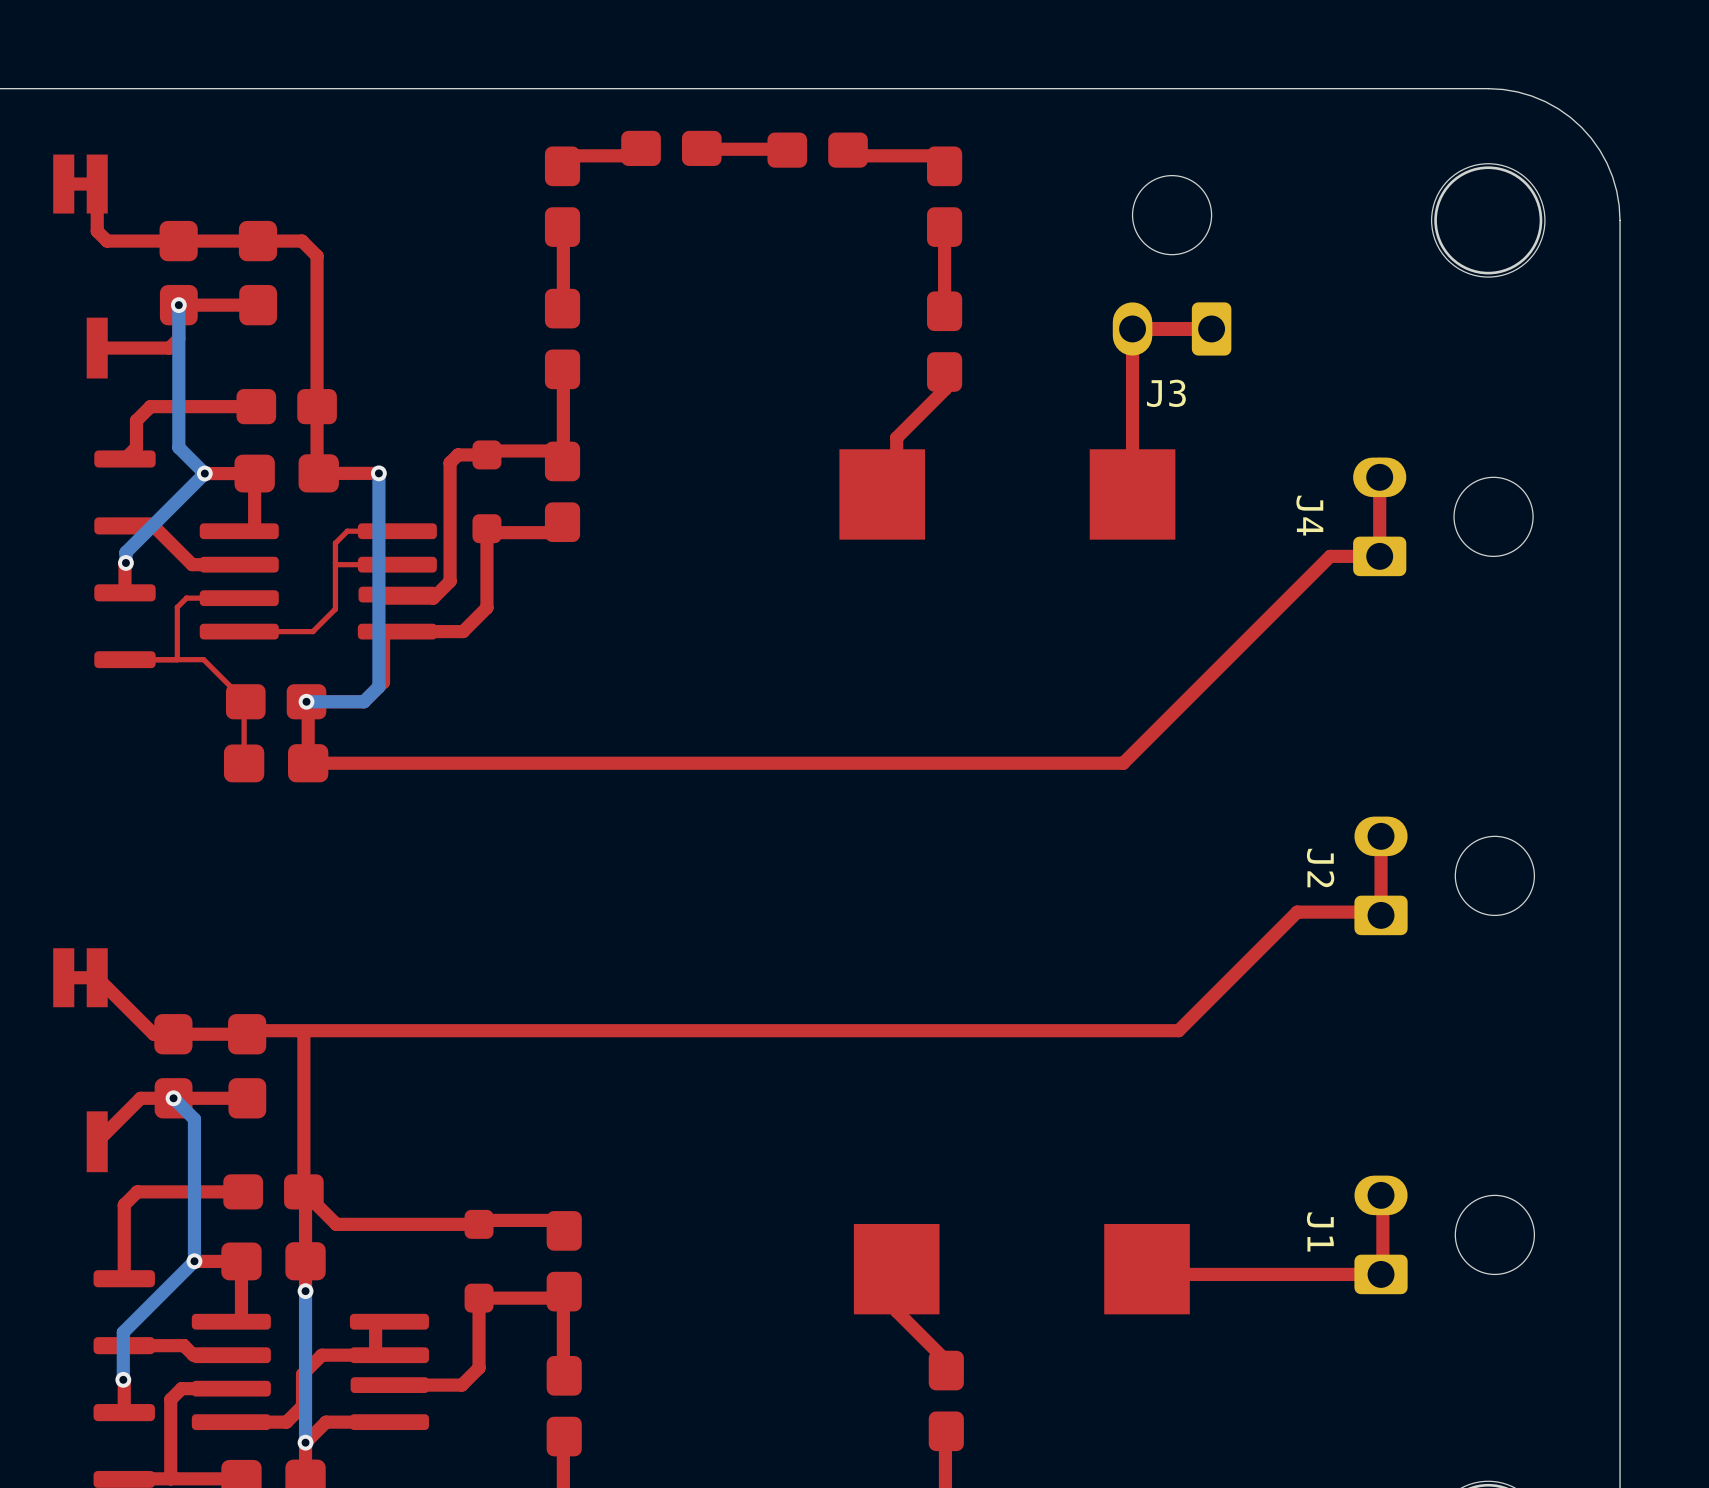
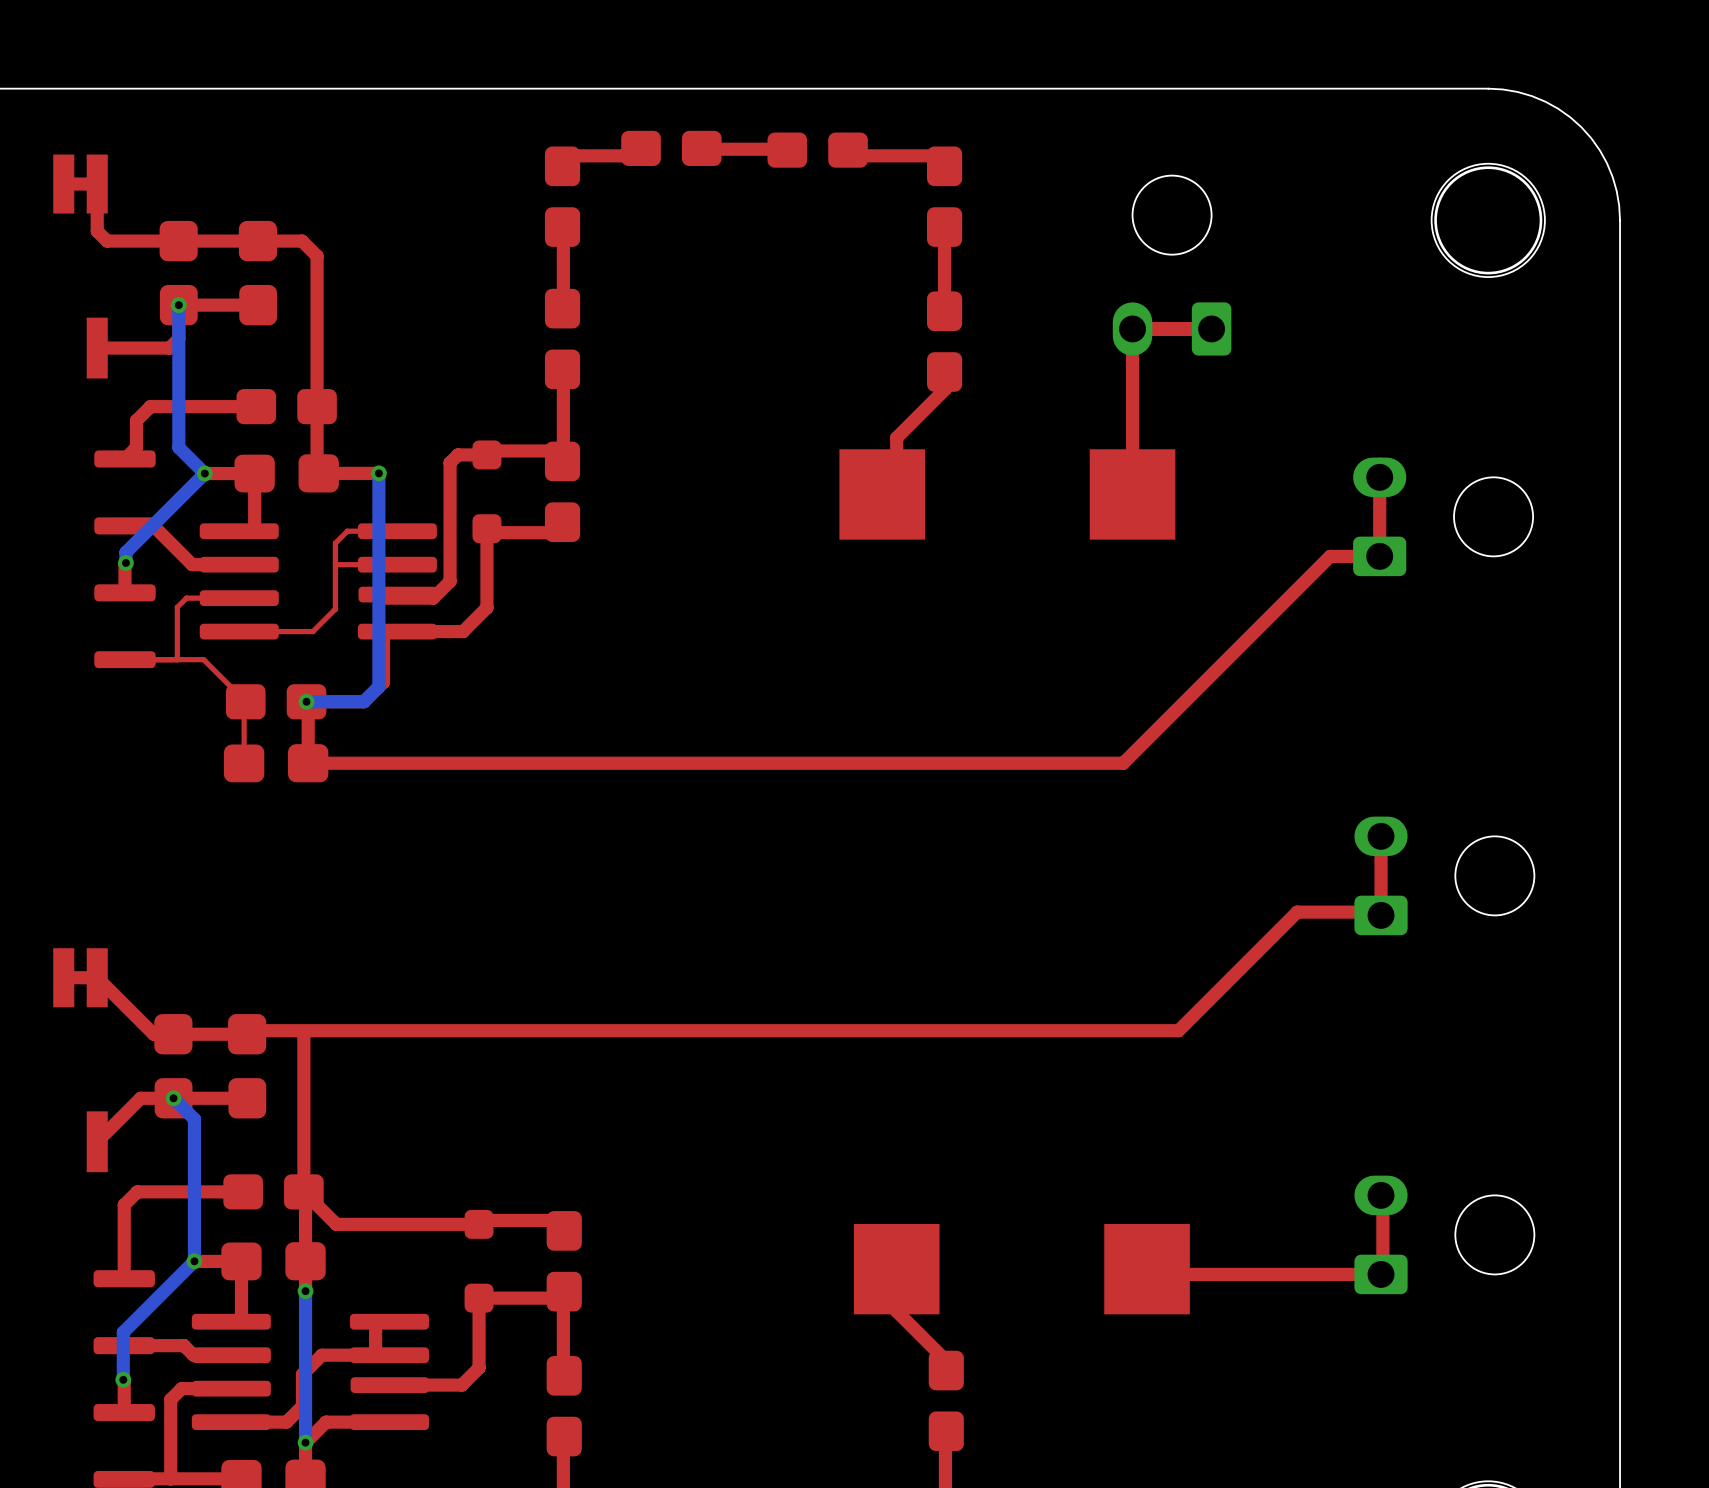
J3 name: J3 (1166, 393) -> none
J4 name: J4 (1309, 515) -> none
J2 name: J2 (1320, 868) -> none
J1 name: J1 (1320, 1232) -> none

